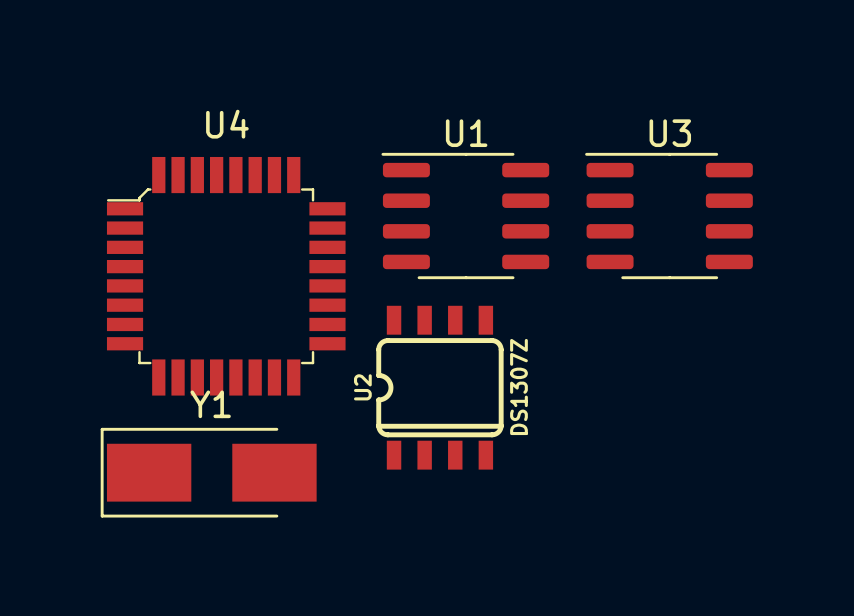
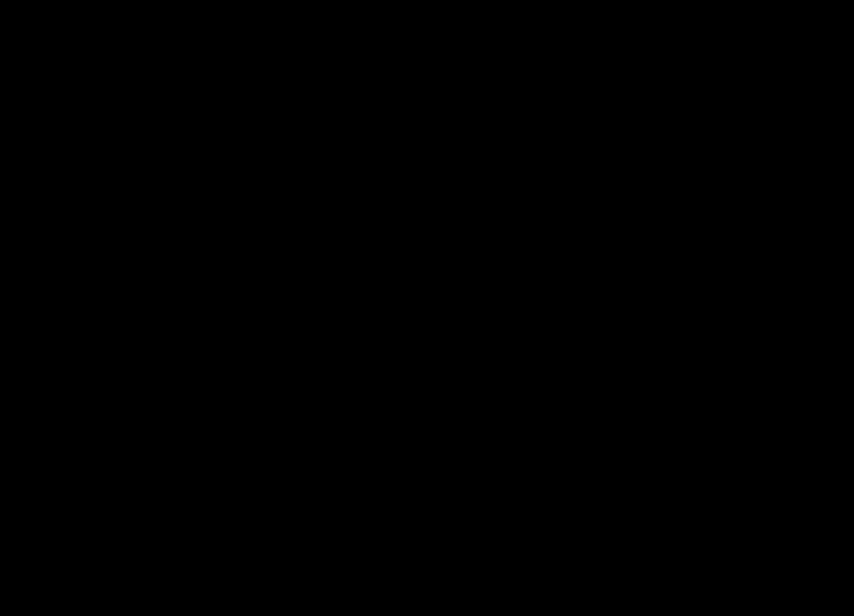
U1: (465, 216) -> none
U3: (668, 216) -> none
U4: (226, 276) -> none
U2: DS1307Z (439, 387) -> none
Y1: (208, 472) -> none

